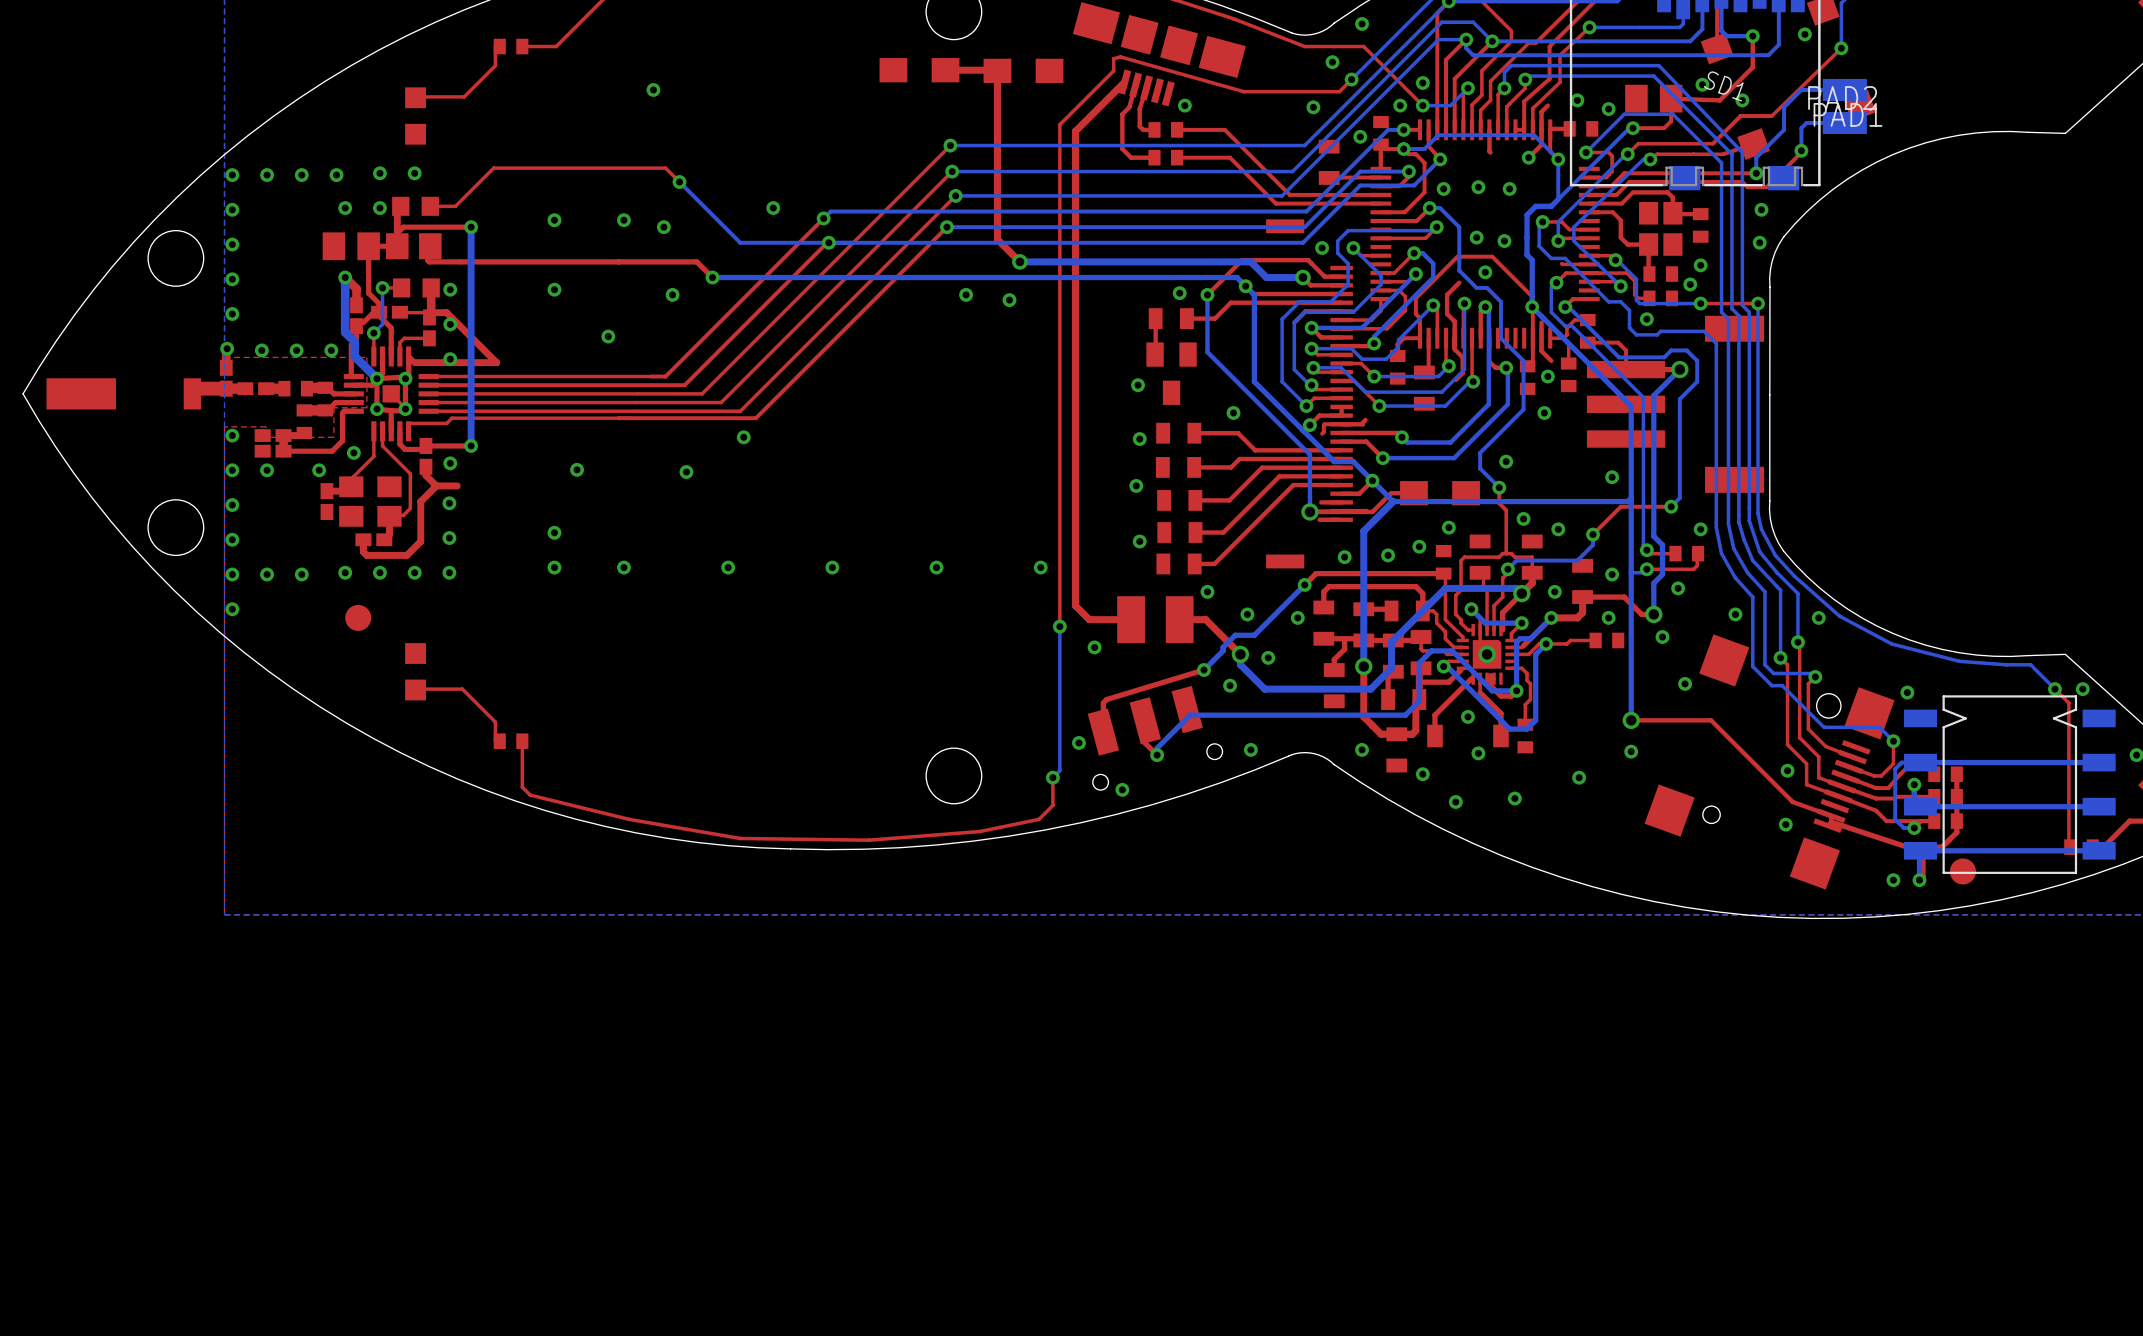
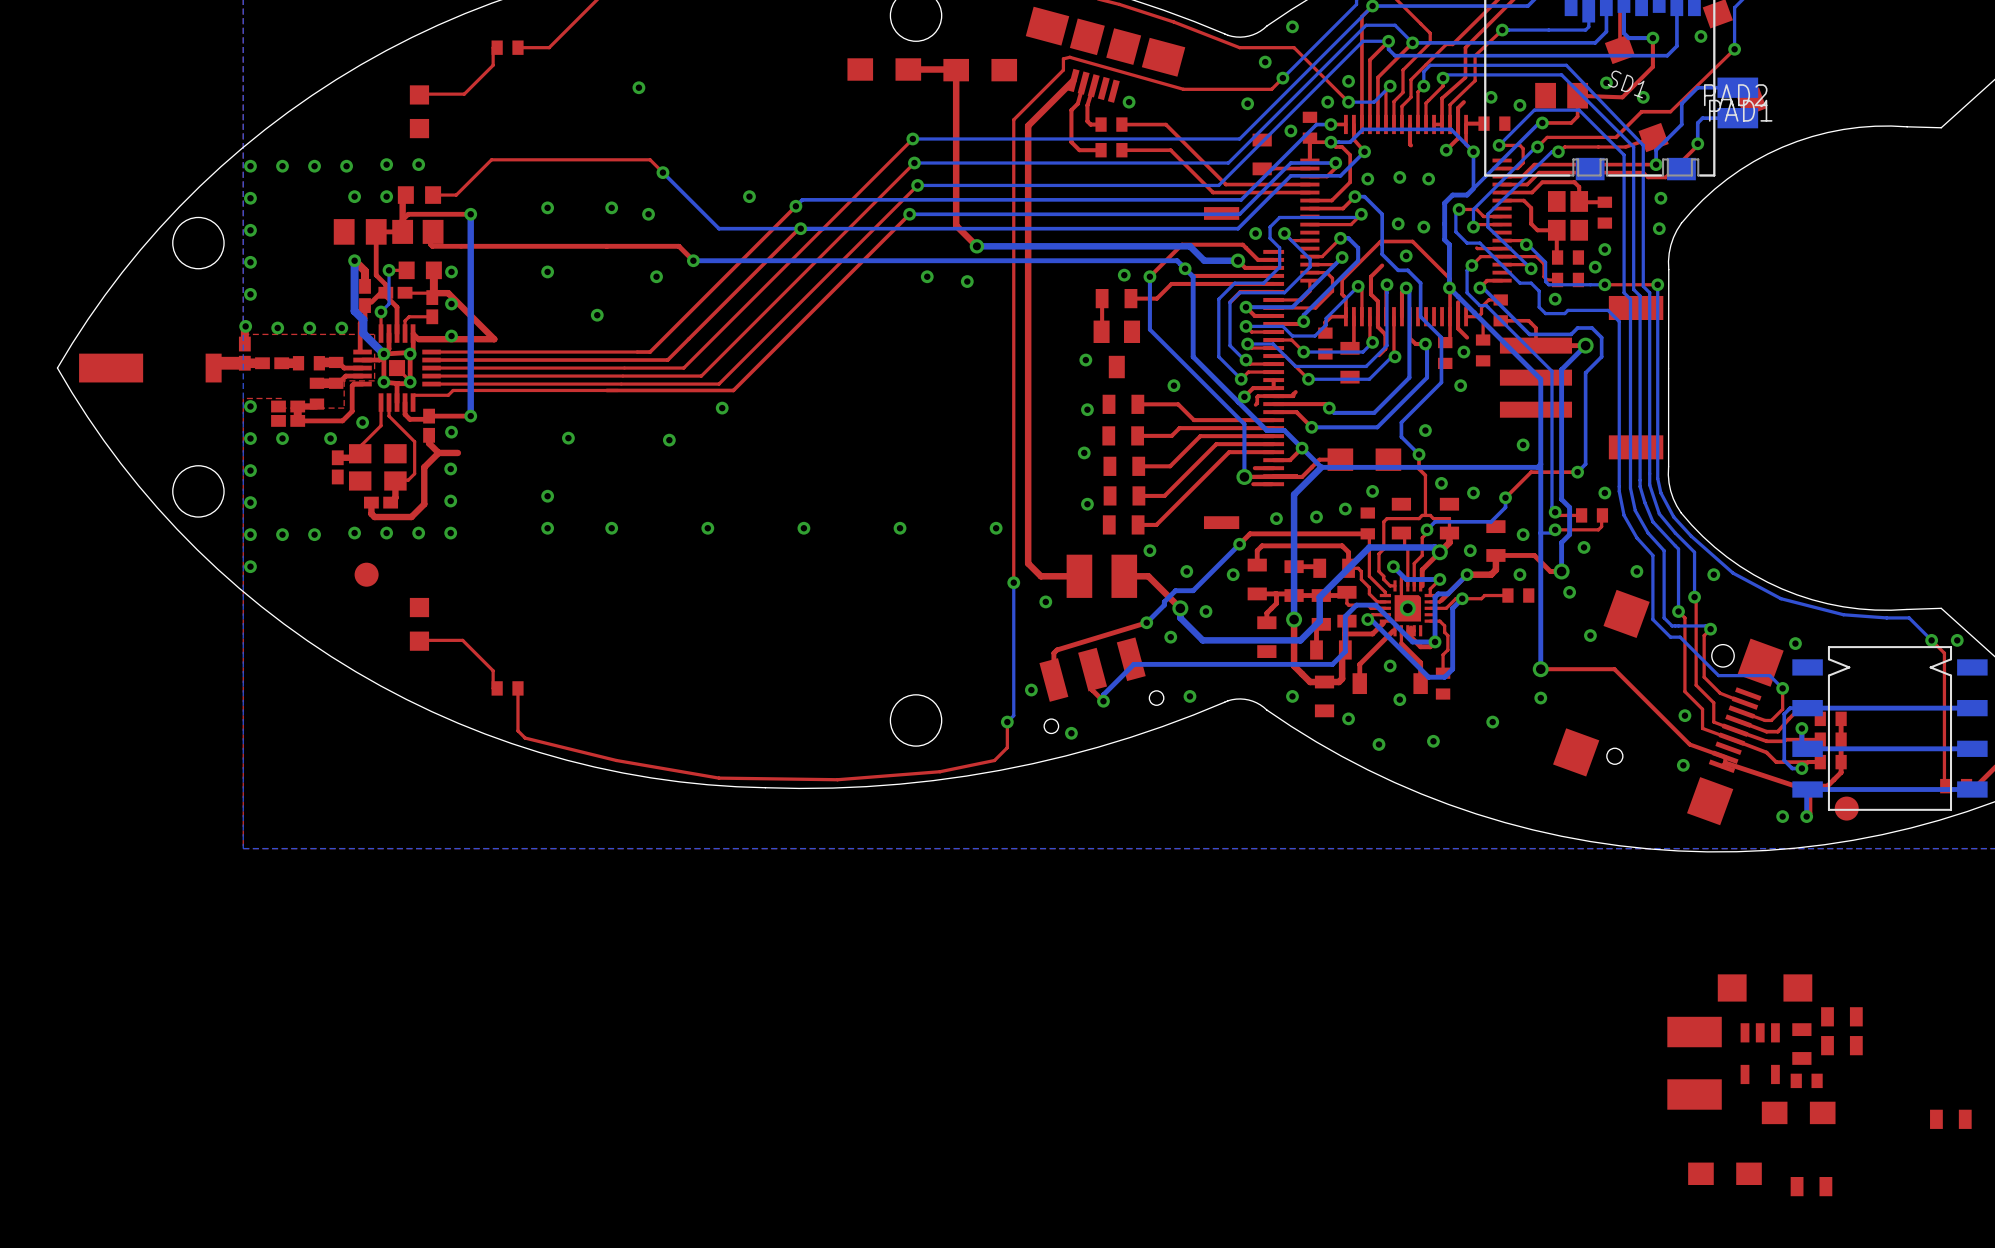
part: none -> (1765, 987)
part: none -> (1841, 1016)
part: none -> (1801, 1044)
part: none -> (1841, 1045)
part: none -> (1760, 1053)
part: none -> (1694, 1063)
part: none -> (1806, 1080)
part: none -> (1798, 1112)
part: none -> (1950, 1119)
part: none -> (1724, 1173)
part: none -> (1811, 1186)

